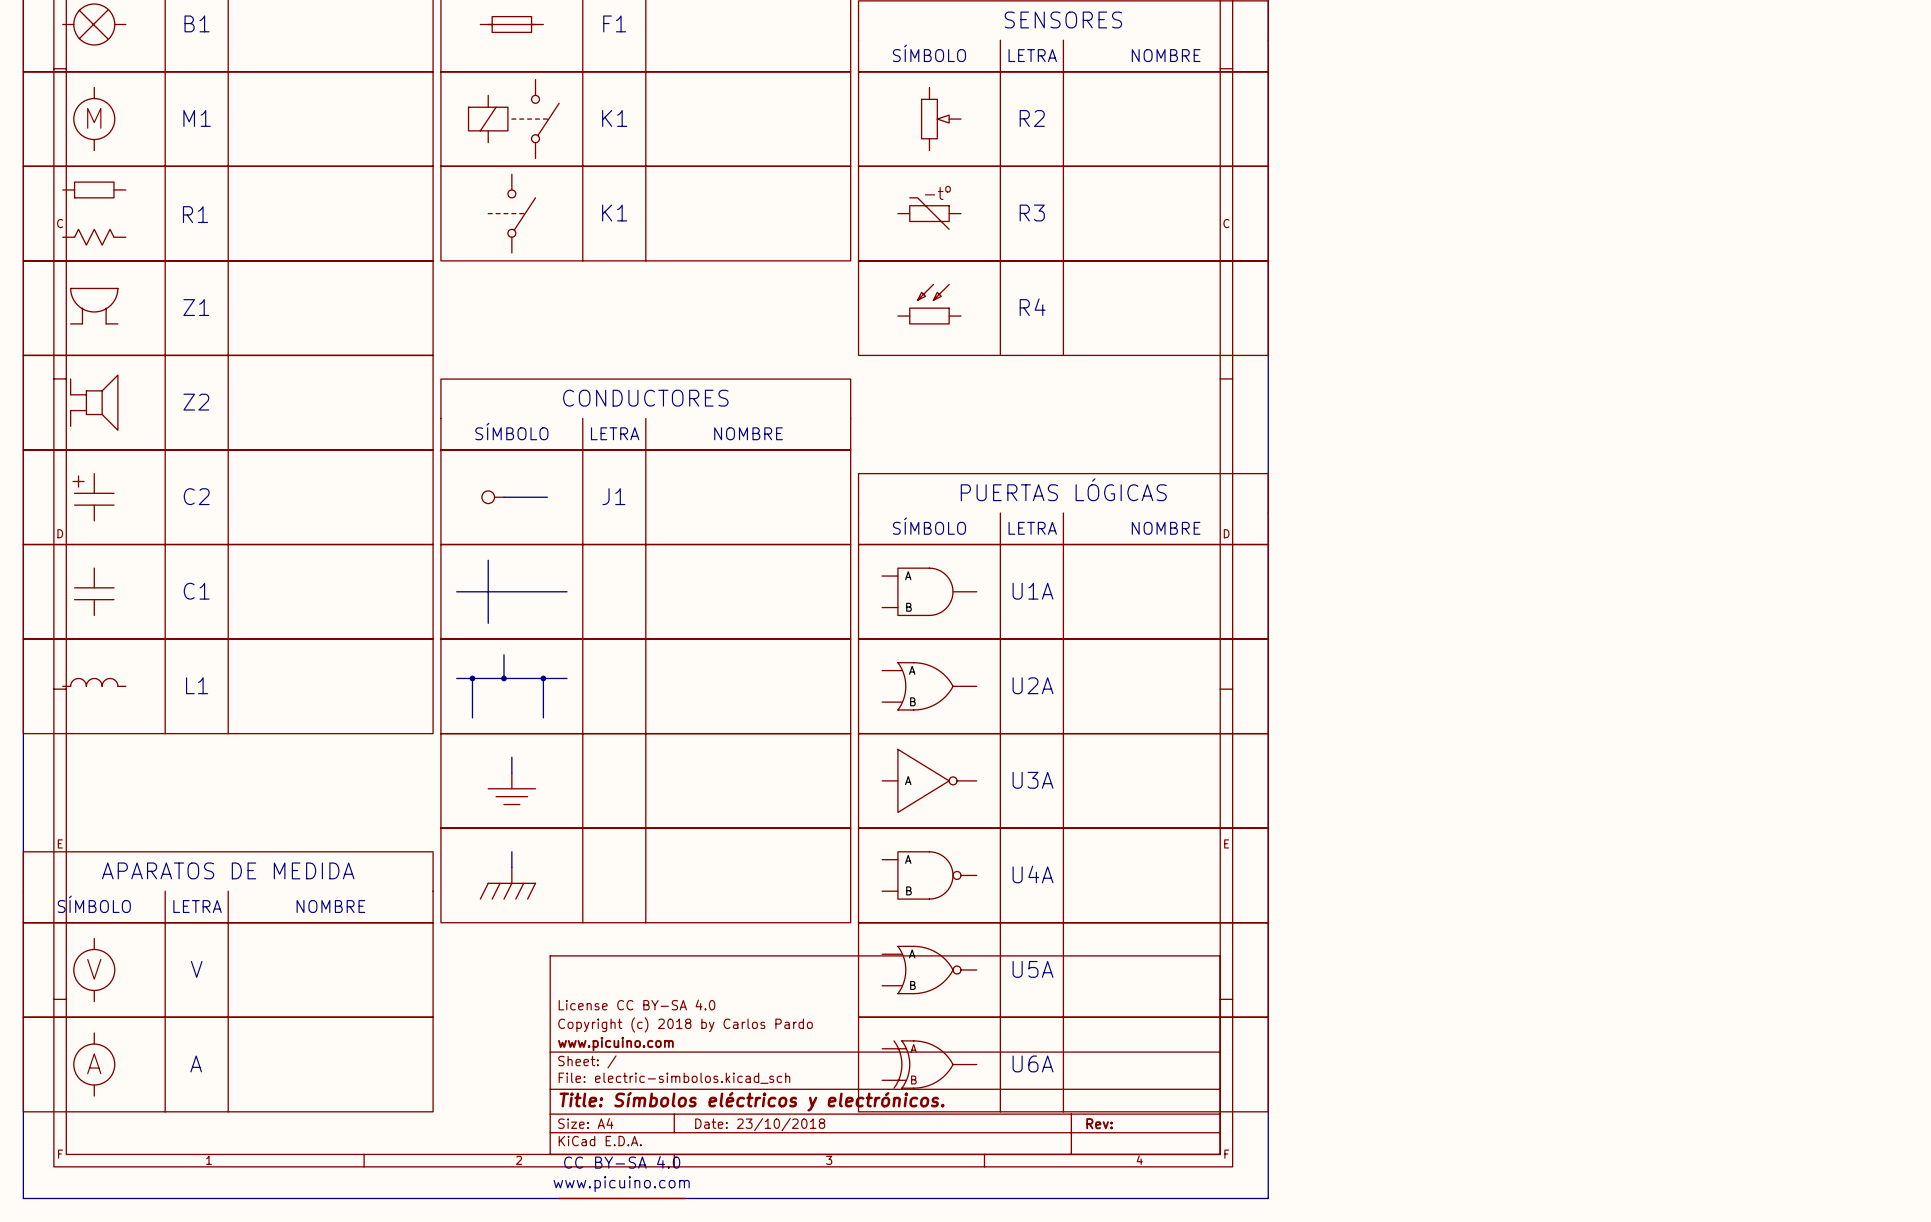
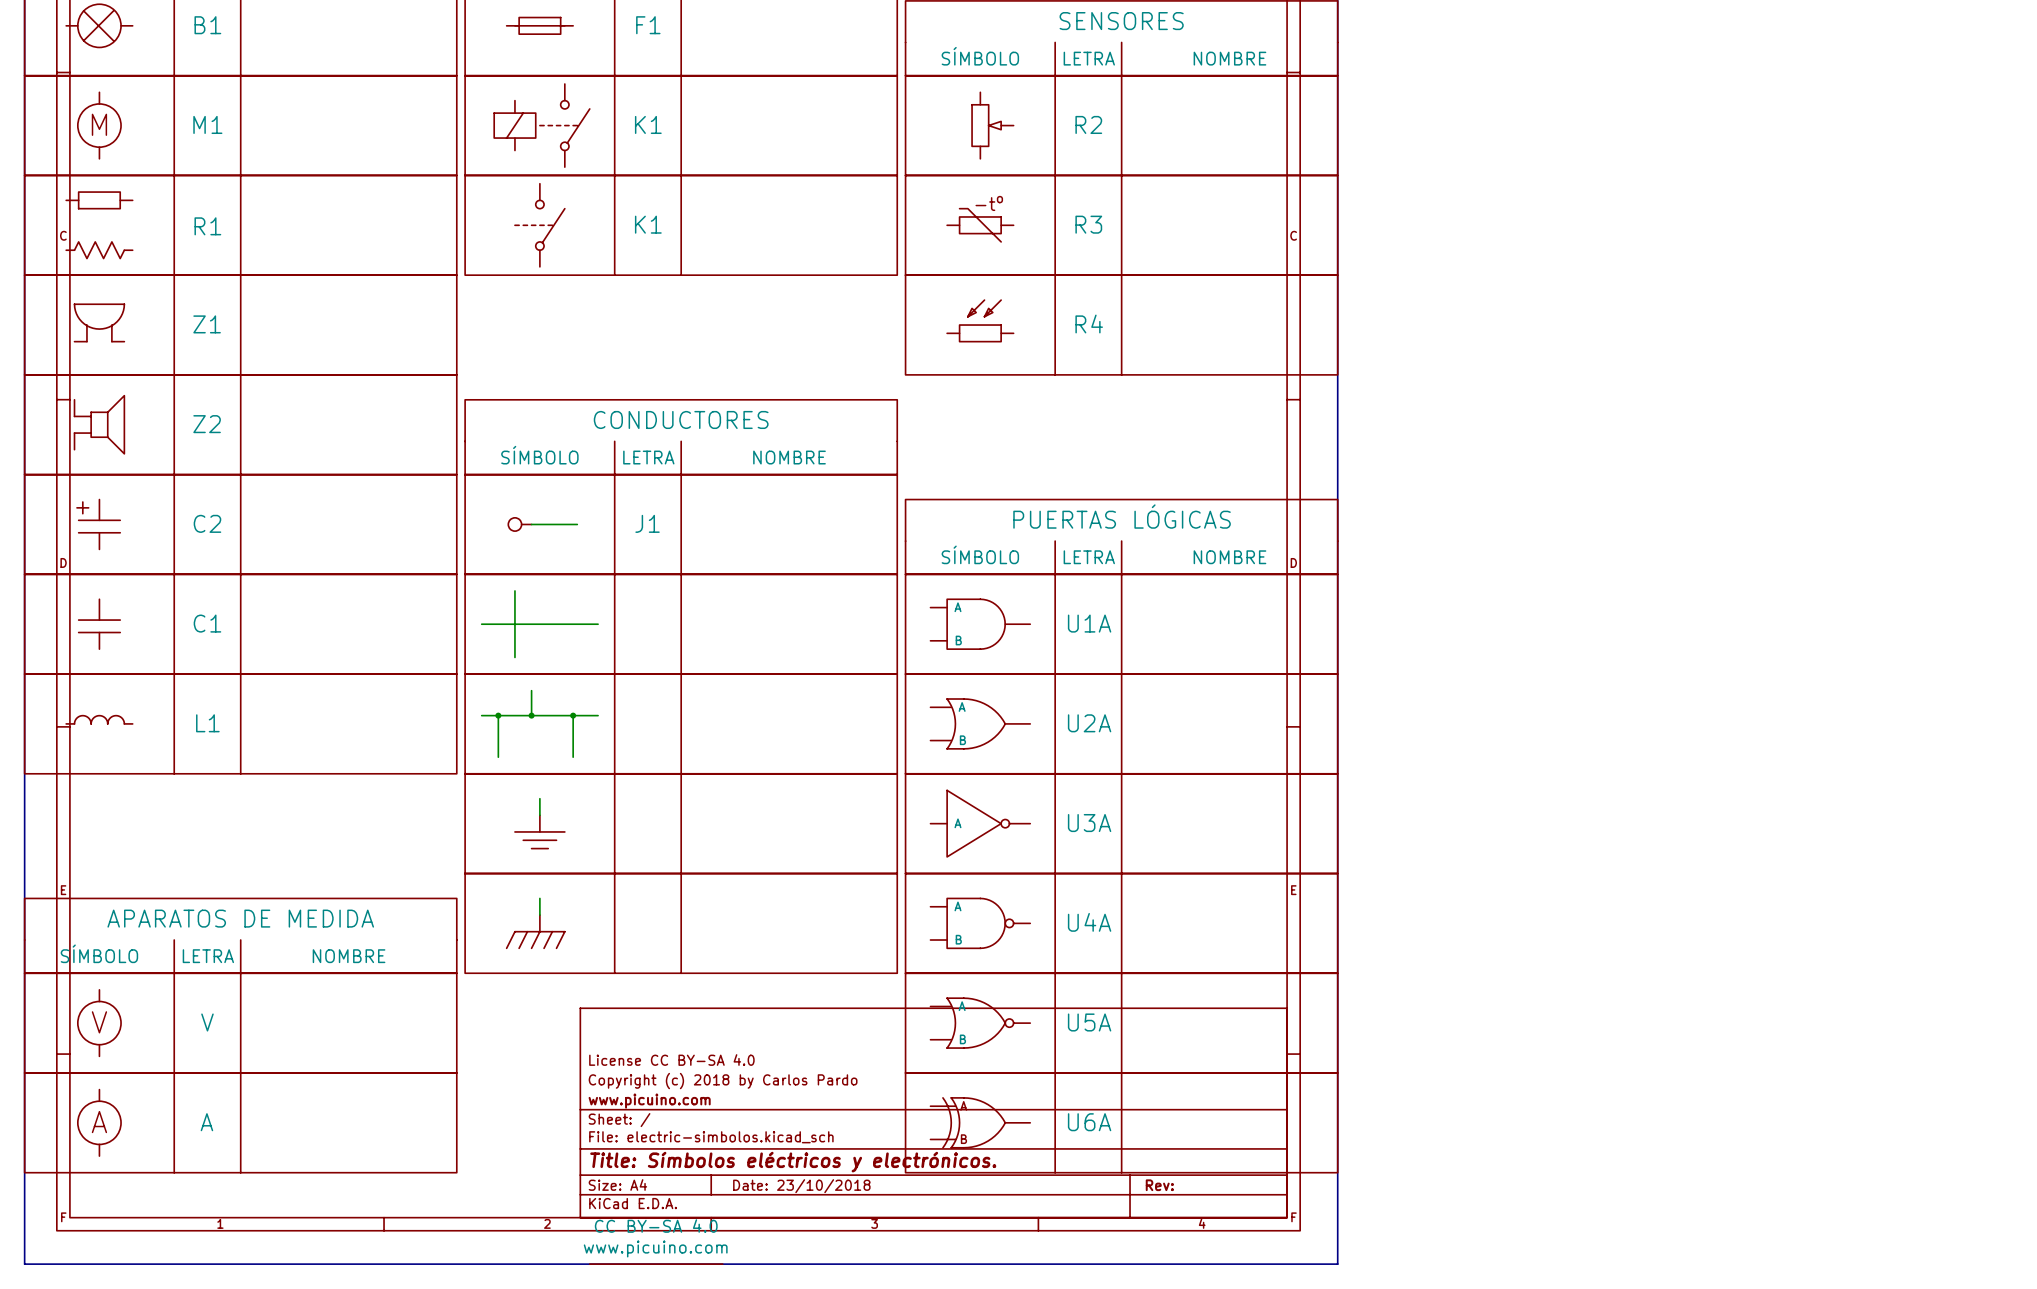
R1 name: none -> R1 (207, 226)
R1: (94, 237) -> none
part: none -> (99, 250)

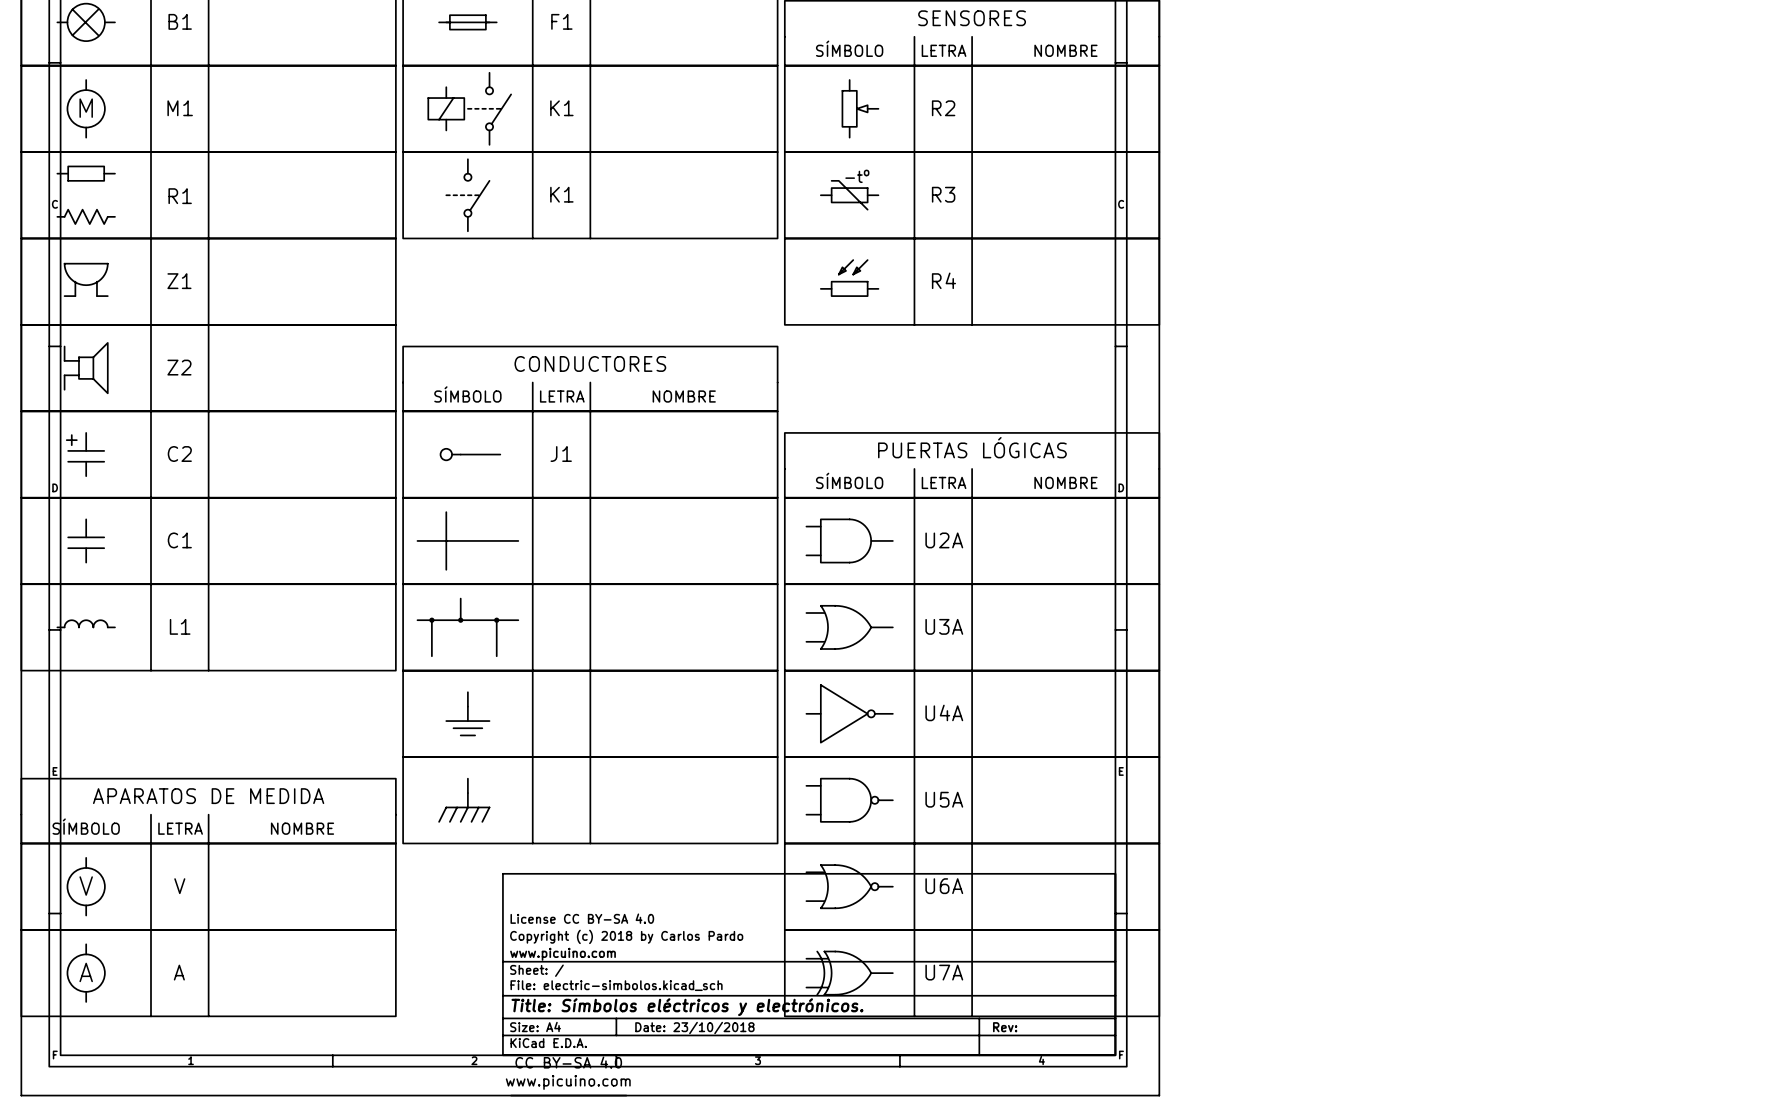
U1A: (980, 624) -> none
U2A symbol: [930, 699, 1031, 749] -> [806, 519, 893, 563]
U3A symbol: [930, 790, 1031, 857] -> [806, 605, 893, 650]
U4A symbol: [930, 898, 1031, 949] -> [806, 685, 893, 743]
U5A symbol: [930, 998, 1031, 1049] -> [806, 778, 893, 822]
U6A symbol: [930, 1097, 1031, 1148] -> [806, 865, 893, 909]
U7A: none -> (849, 973)

